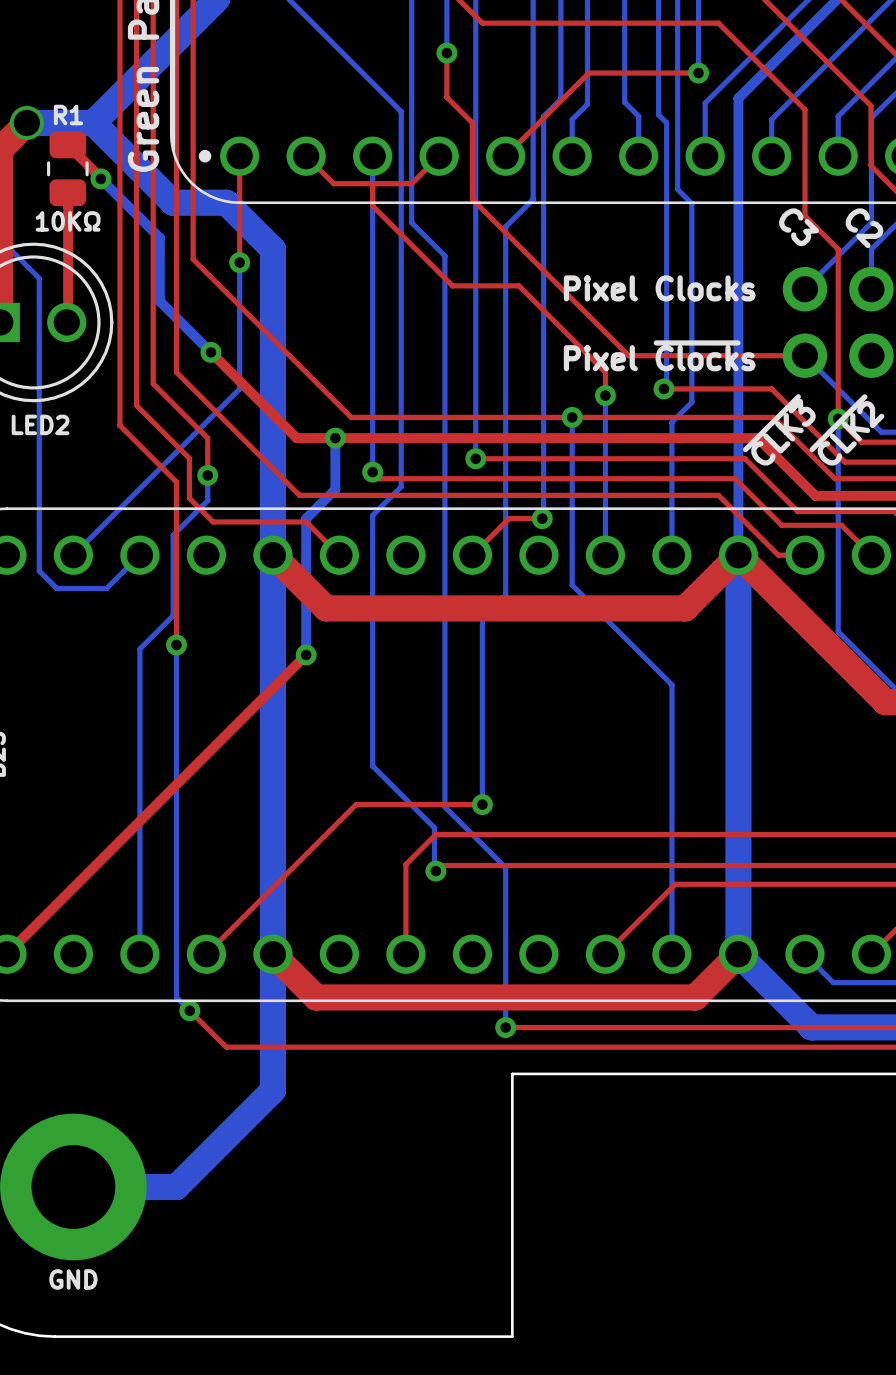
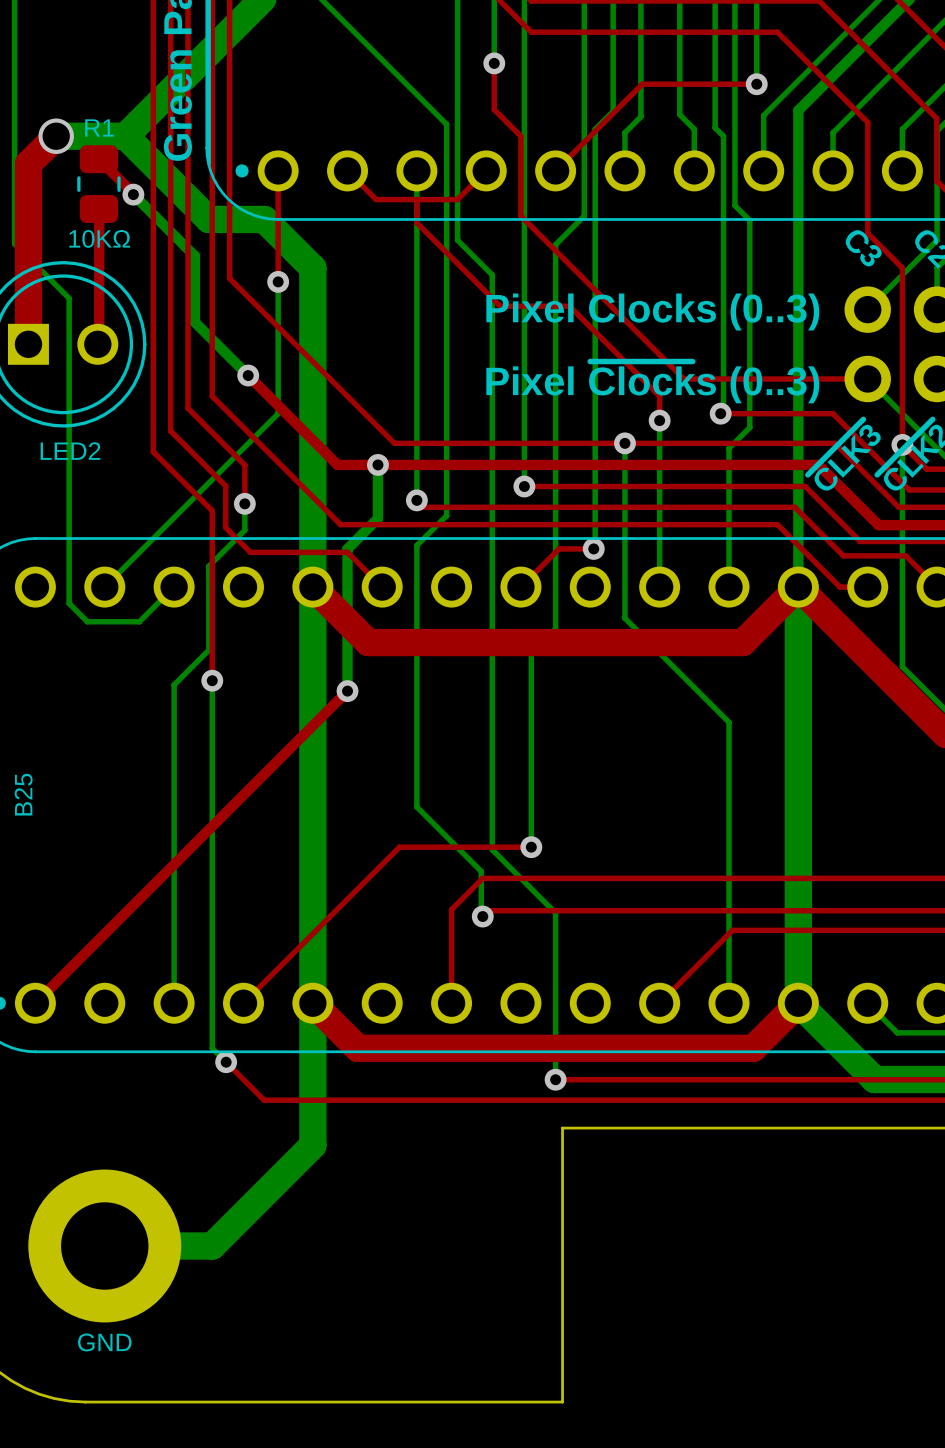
text: Pixel Clocks (659, 288) -> Pixel Clocks (0..3) (652, 312)
text: Pixel ~{Clock}s (659, 355) -> Pixel ~{Clock}s (0..3) (652, 382)

